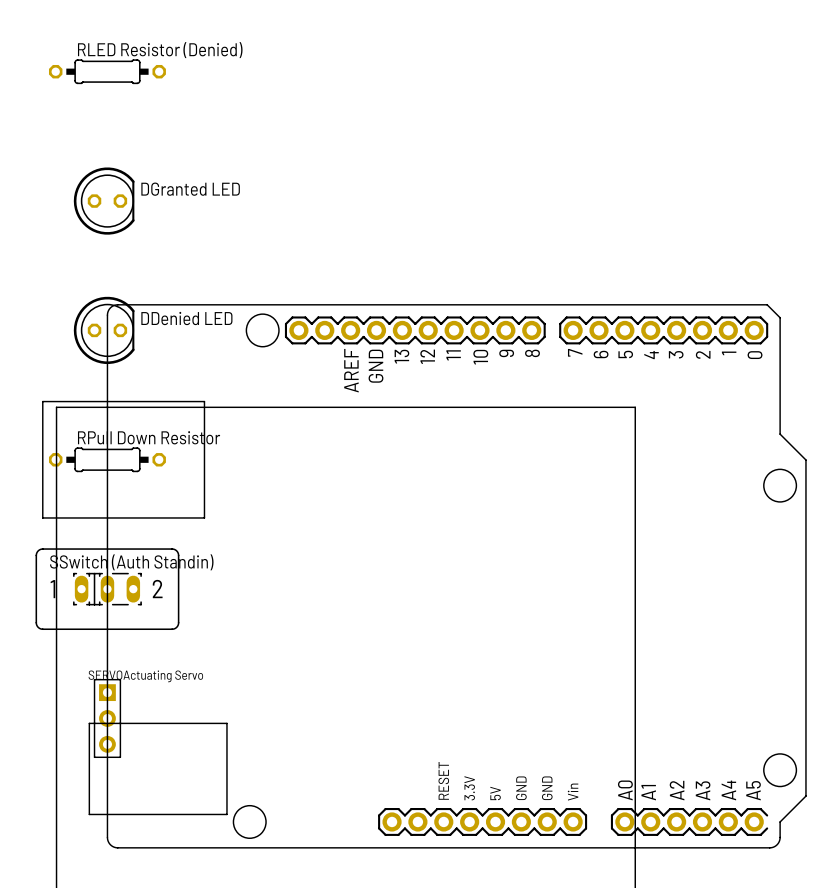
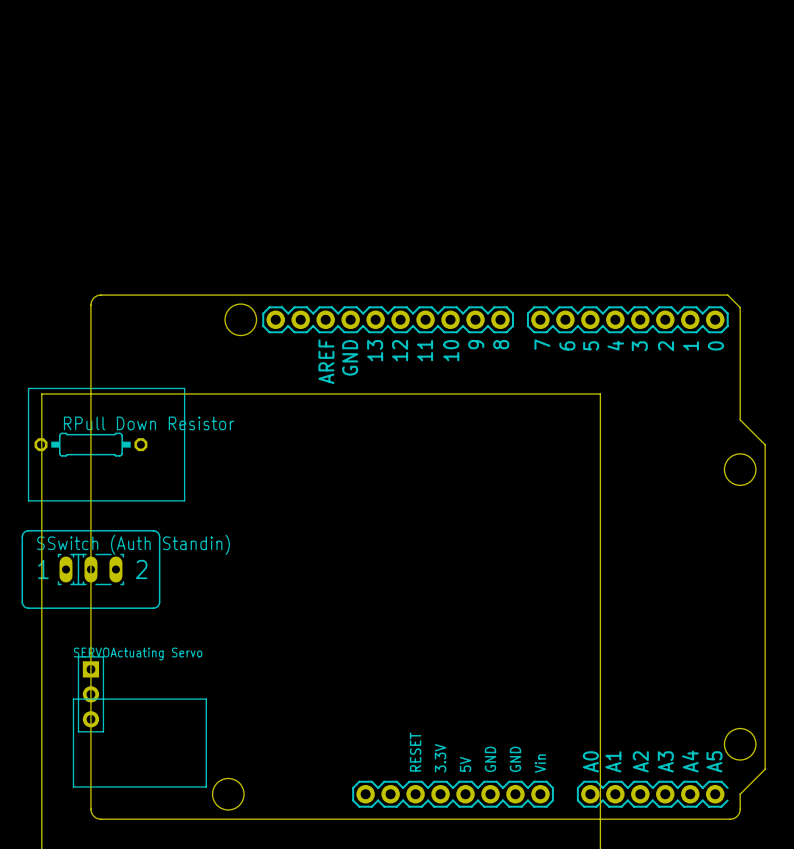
RLED Resistor (Denied): (107, 71) -> none
DGranted LED: (104, 201) -> none
DDenied LED: (104, 330) -> none

